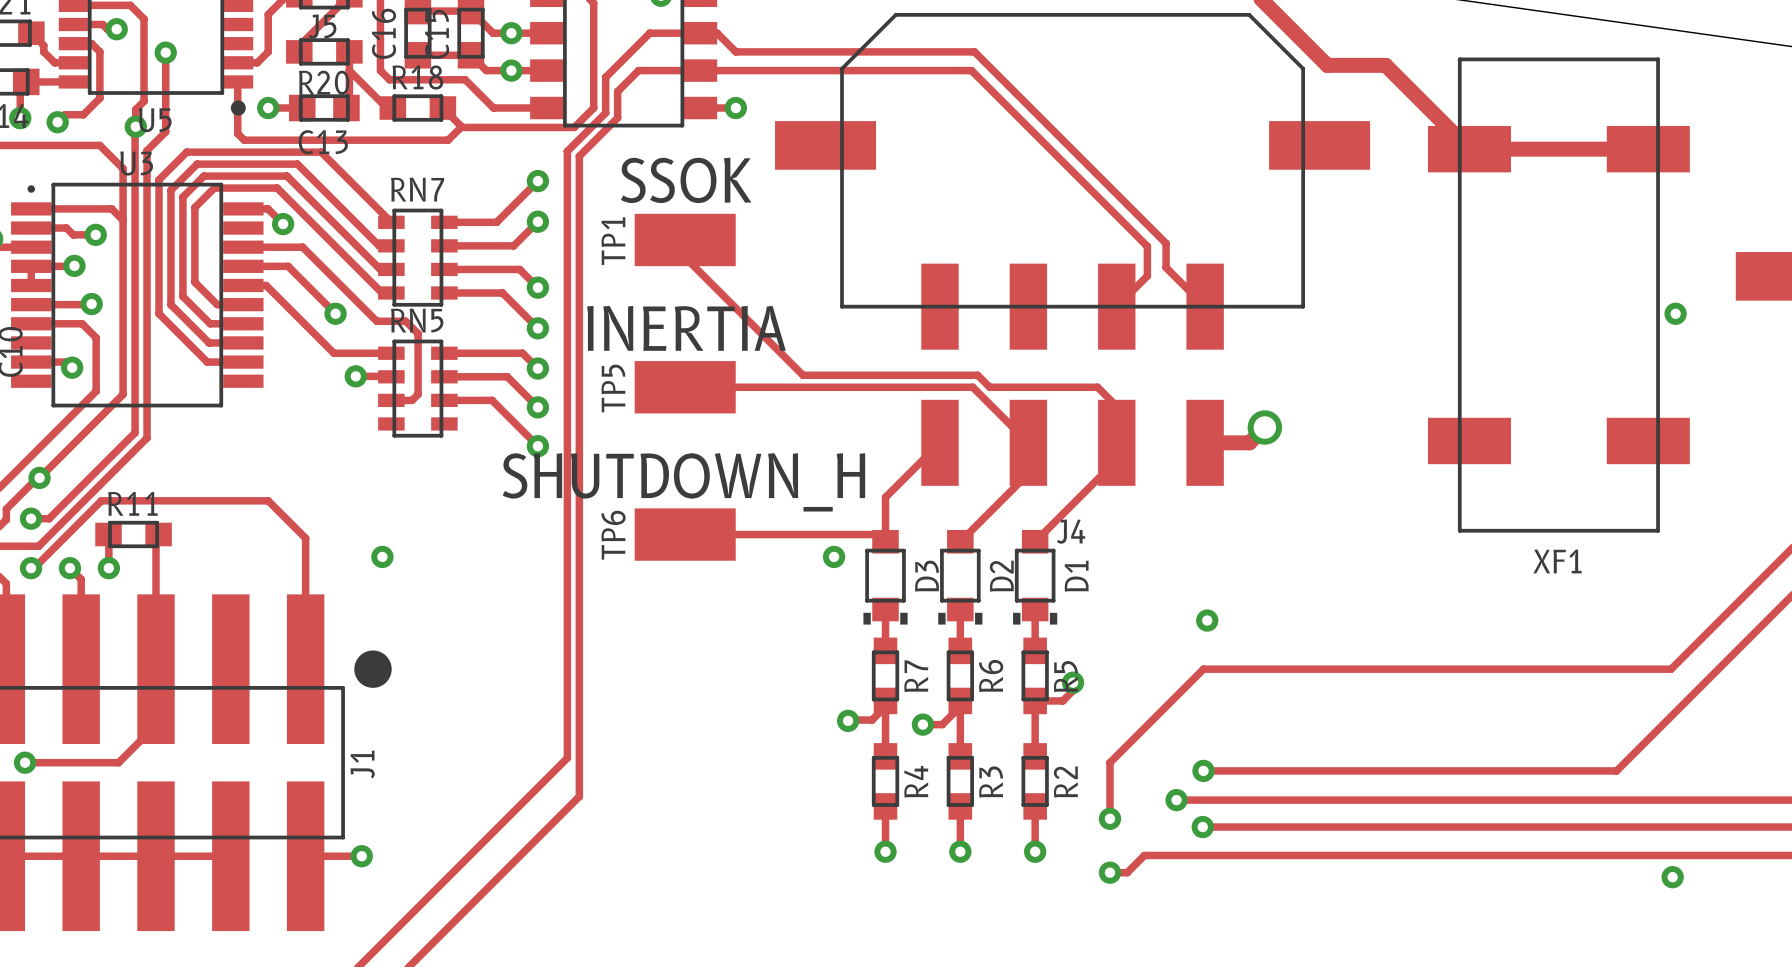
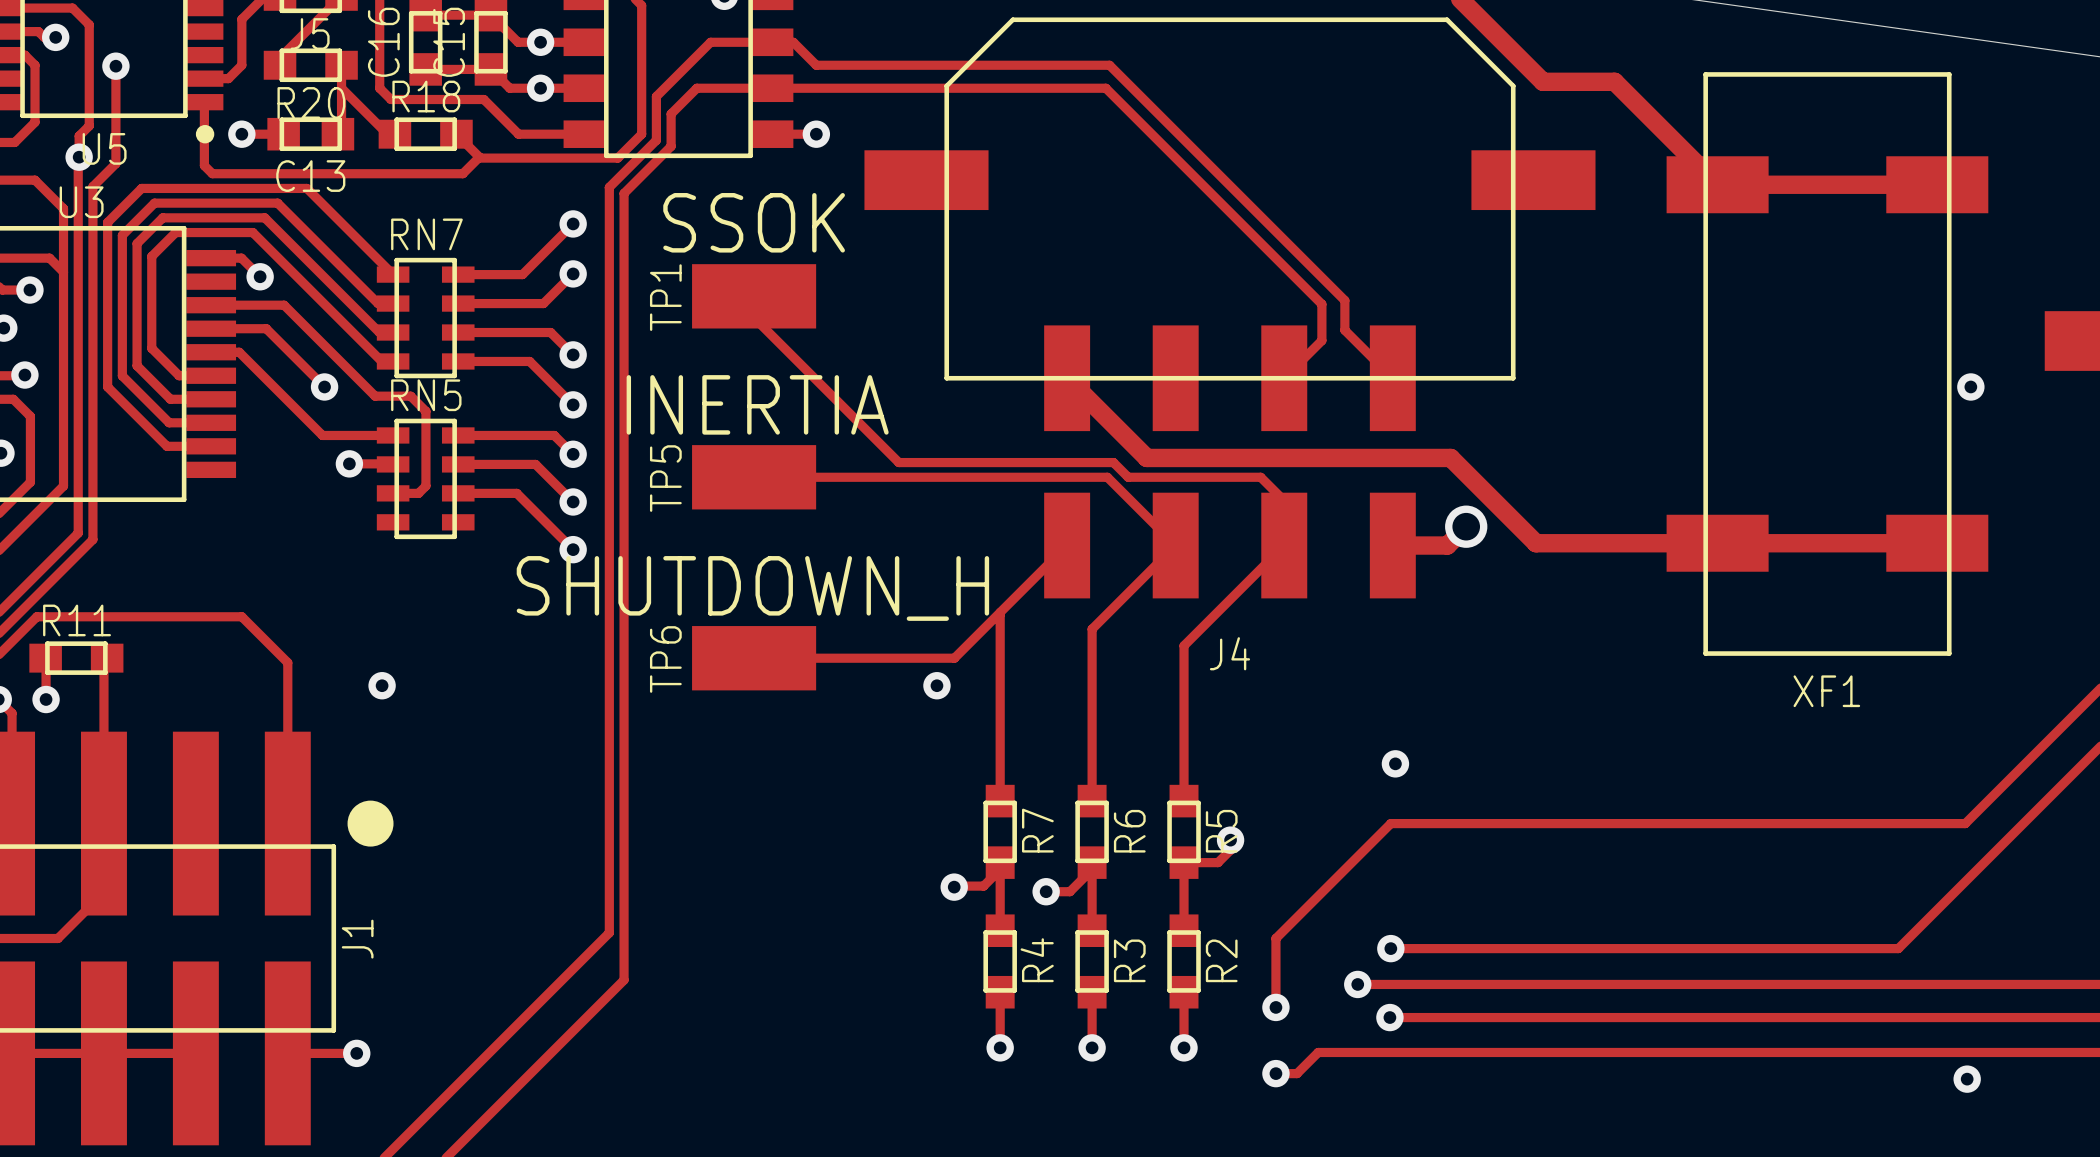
track: none -> (1067, 378) (1146, 457) (1450, 457) (1536, 543) (1937, 543)
track: none -> (1175, 545) (1092, 629) (1092, 750)
track: none -> (1284, 545) (1184, 645) (1184, 750)
track: (1116, 460) (1035, 541) -> none
track: (1028, 473) (960, 541) -> none
track: (848, 534) (885, 534) -> (954, 658) (1000, 612)
track: none -> (1000, 667) (1000, 750)
D3: (885, 577) -> none
D2: (960, 577) -> none
D1: (1035, 577) -> none

